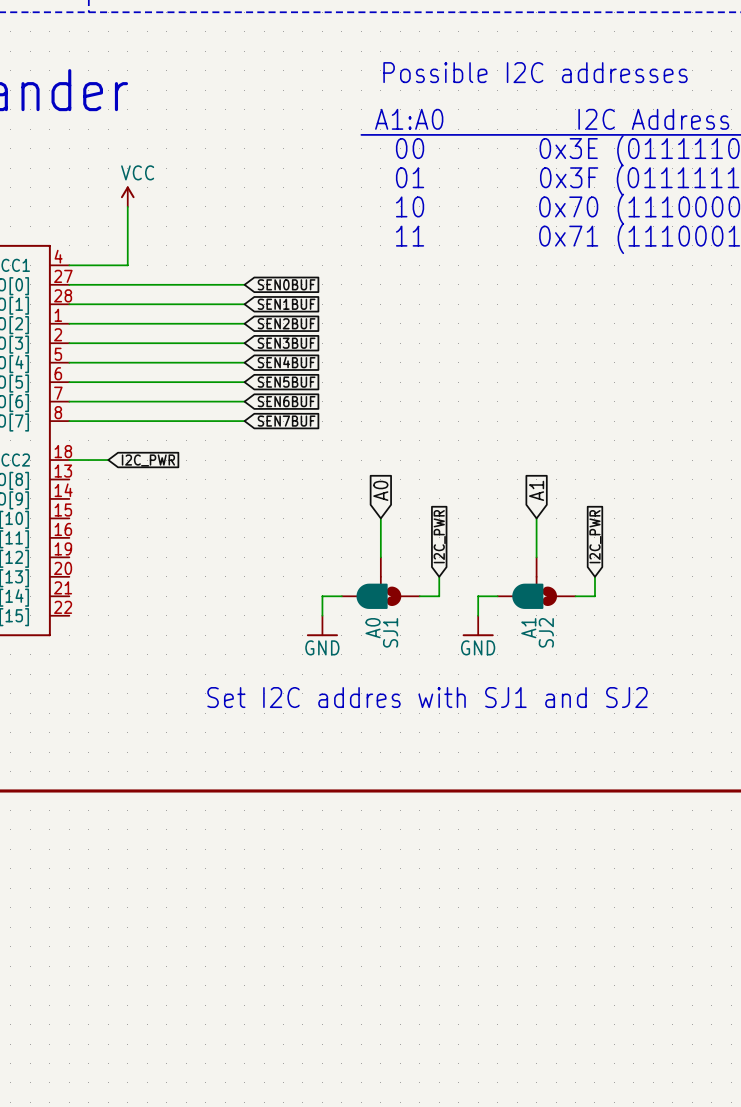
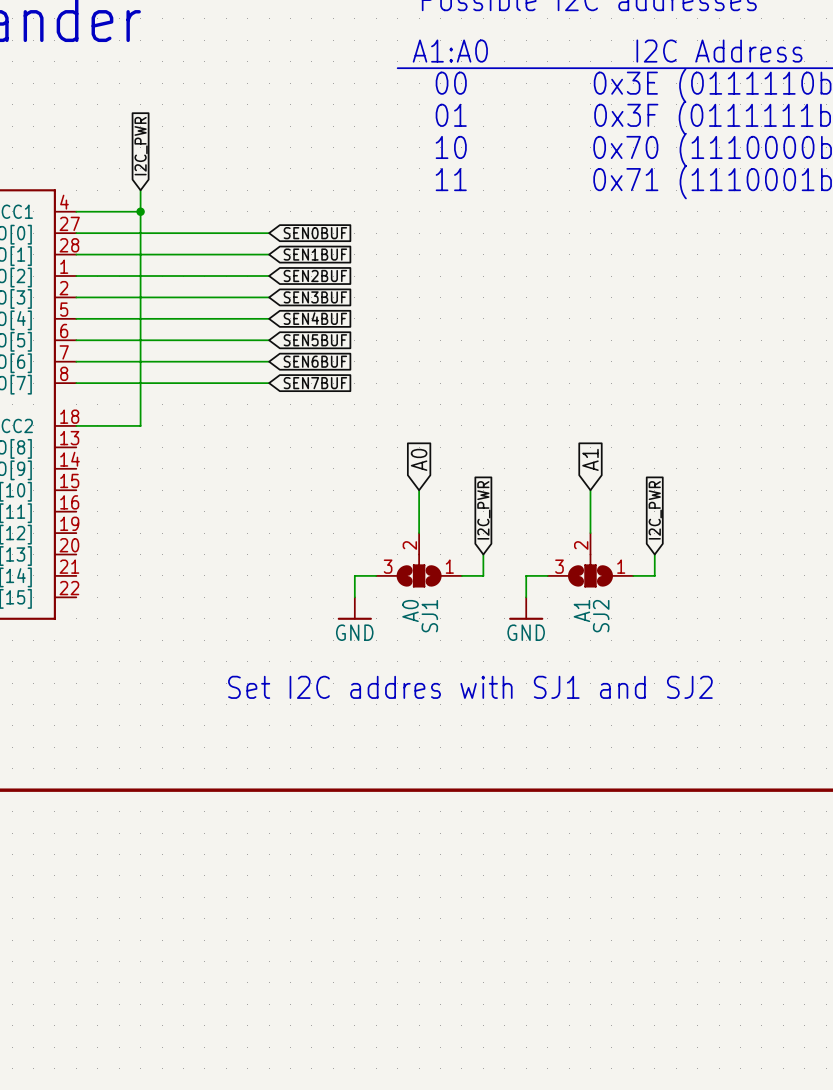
power symbol: VCC (127, 196) -> none
global label: none -> I2C_PWR (141, 146)
wire: (127, 206) (127, 245) -> none
wire: none -> (140, 211) (140, 425) (119, 425)
junction: none -> (140, 211)
global label: I2C_PWR (148, 460) -> none
SJ1 symbol: [341, 557, 420, 609] -> [376, 533, 462, 588]
SJ2 symbol: [497, 557, 576, 609] -> [547, 533, 634, 588]

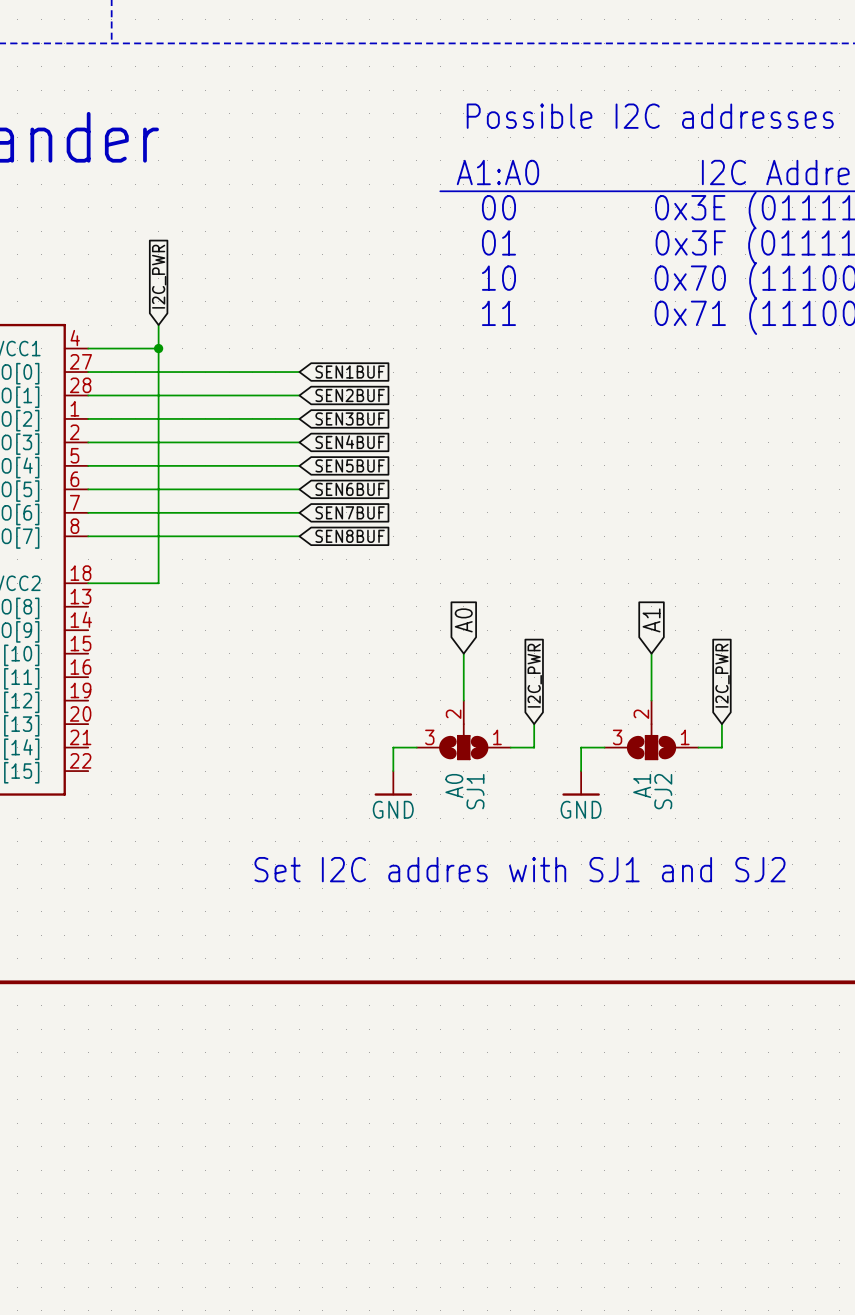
global label: SEN0BUF (315, 233) -> SEN1BUF (350, 372)
global label: SEN1BUF (315, 254) -> SEN2BUF (350, 395)
global label: SEN2BUF (315, 276) -> SEN3BUF (350, 418)
global label: SEN3BUF (315, 297) -> SEN4BUF (350, 442)
global label: SEN4BUF (315, 318) -> SEN5BUF (350, 465)
global label: SEN5BUF (315, 340) -> SEN6BUF (350, 489)
global label: SEN6BUF (315, 361) -> SEN7BUF (350, 512)
global label: SEN7BUF (315, 383) -> SEN8BUF (350, 536)

